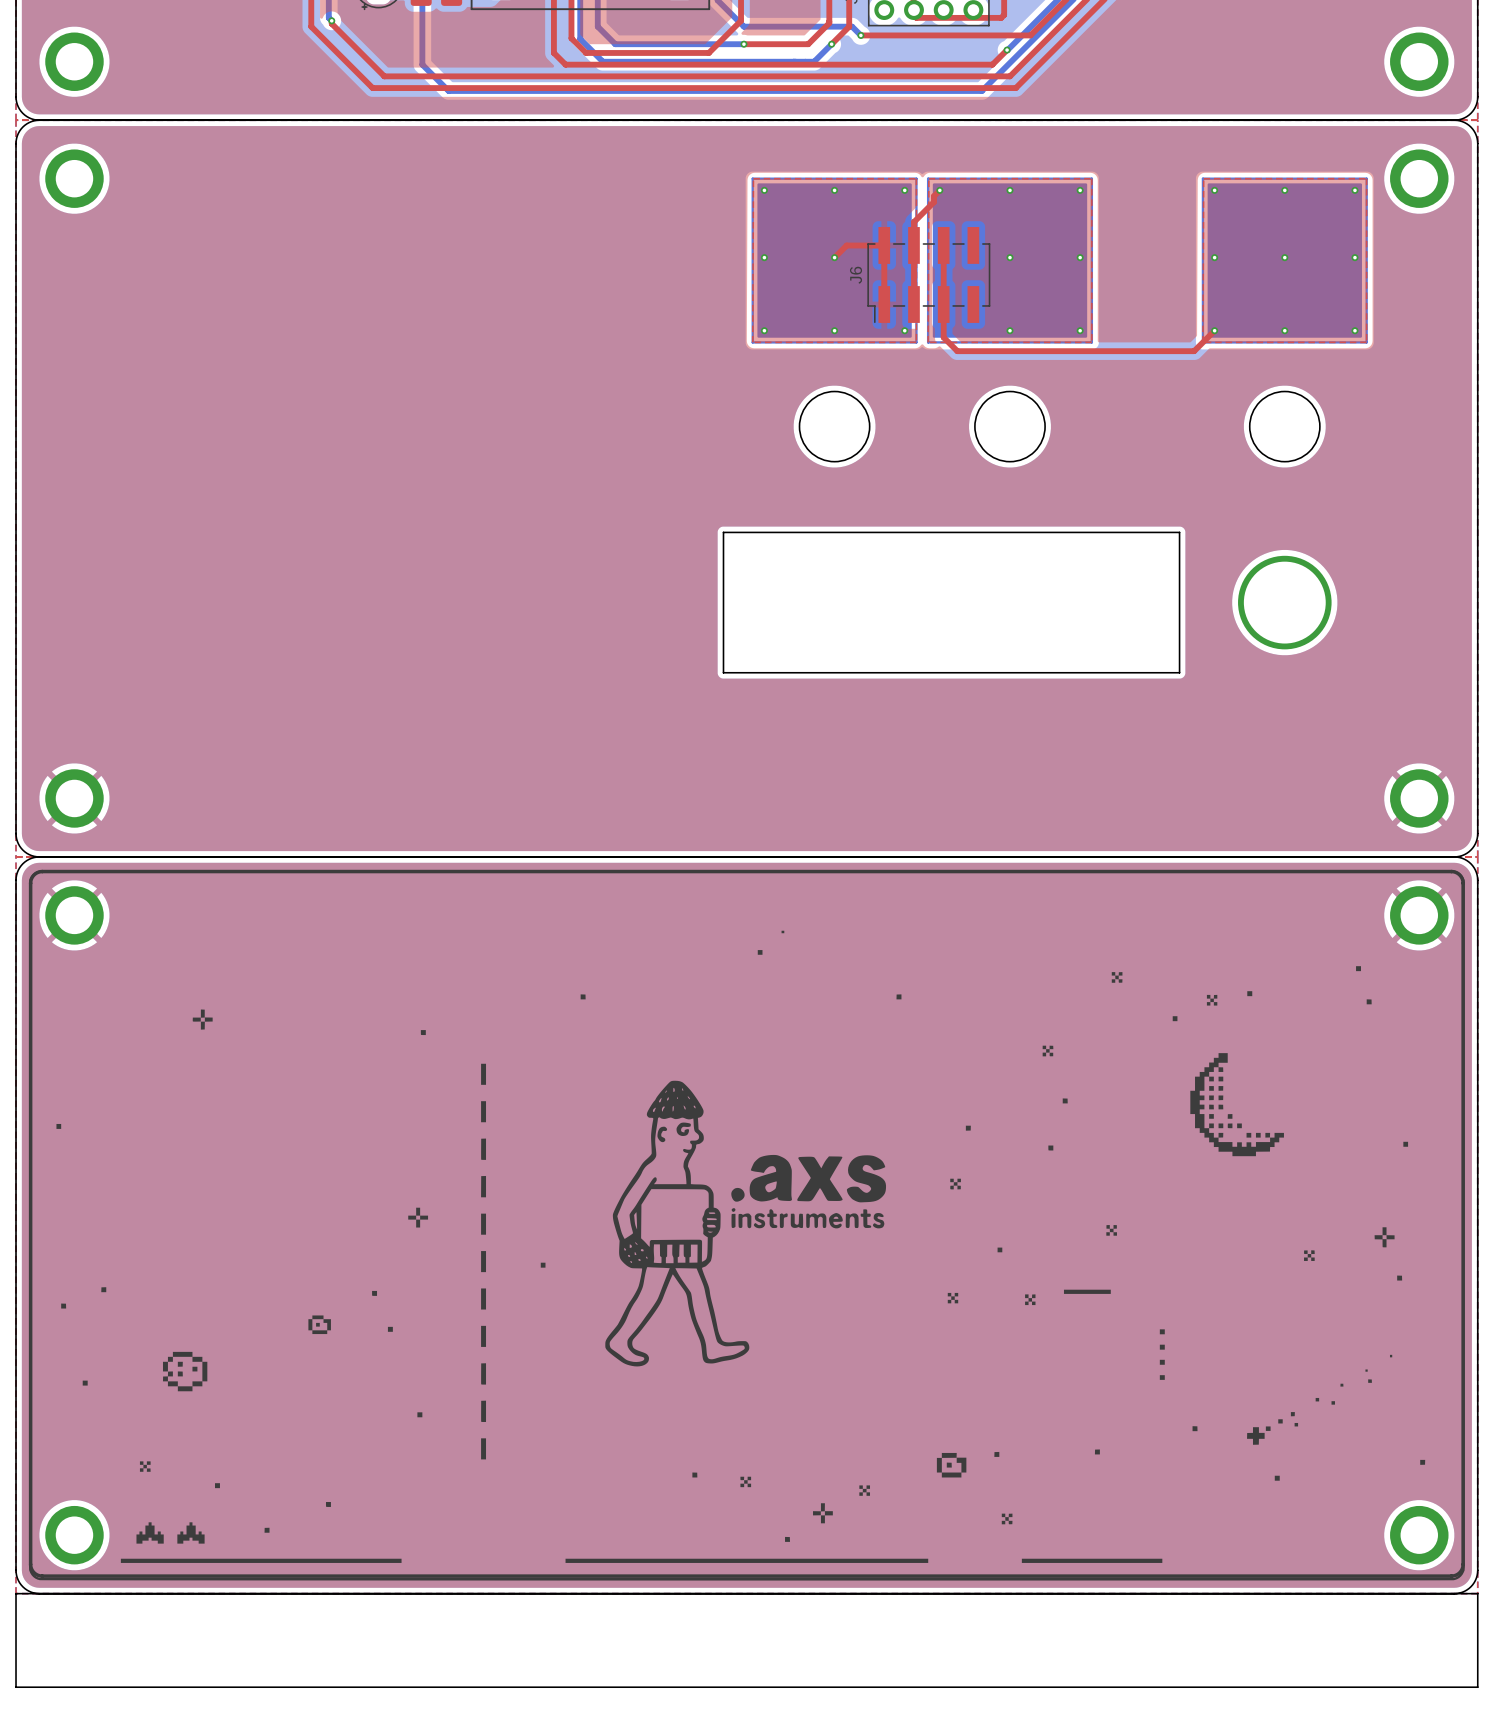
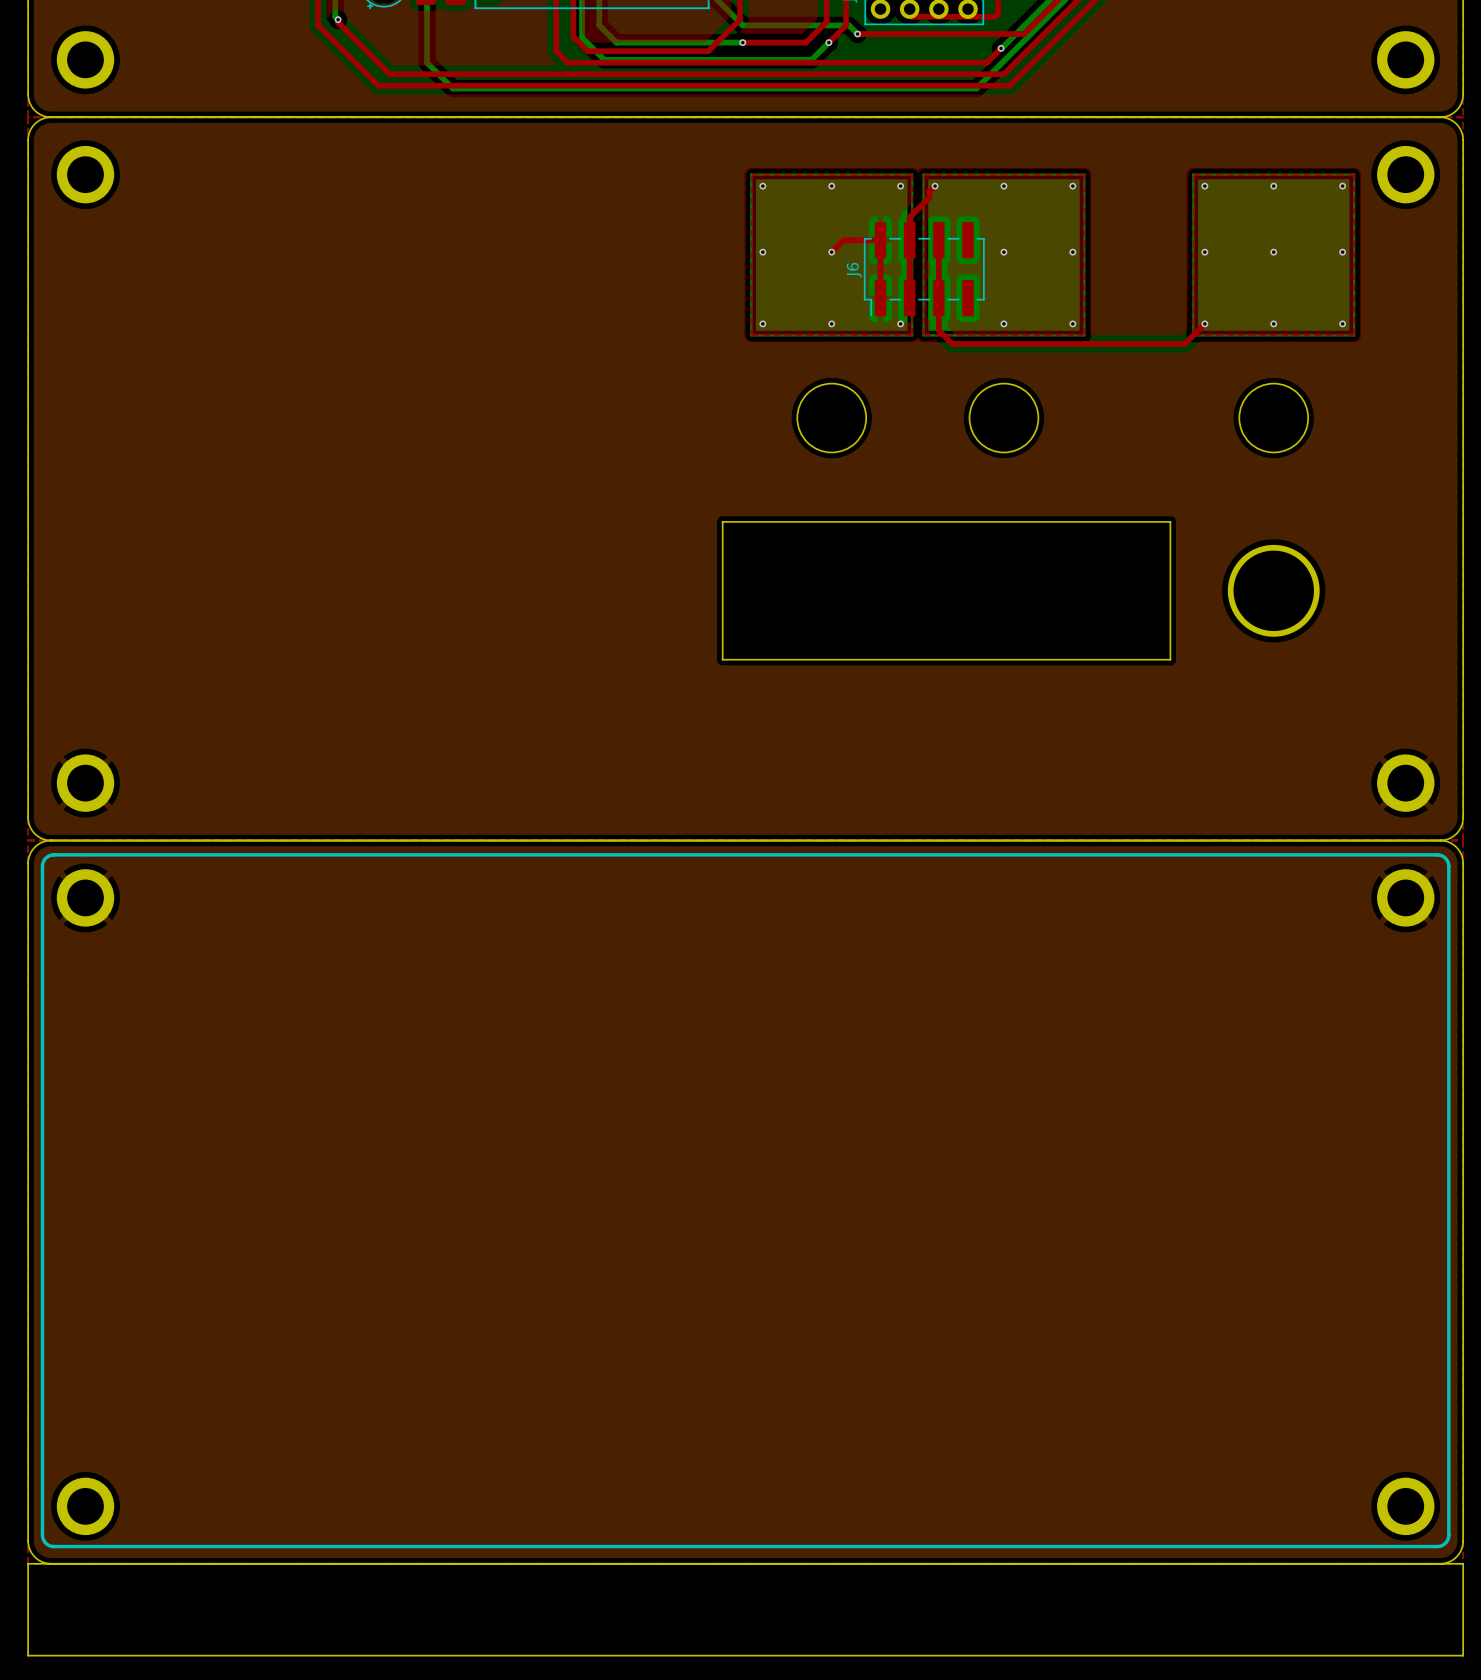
drawing: [15, 870, 1479, 1581] -> none

